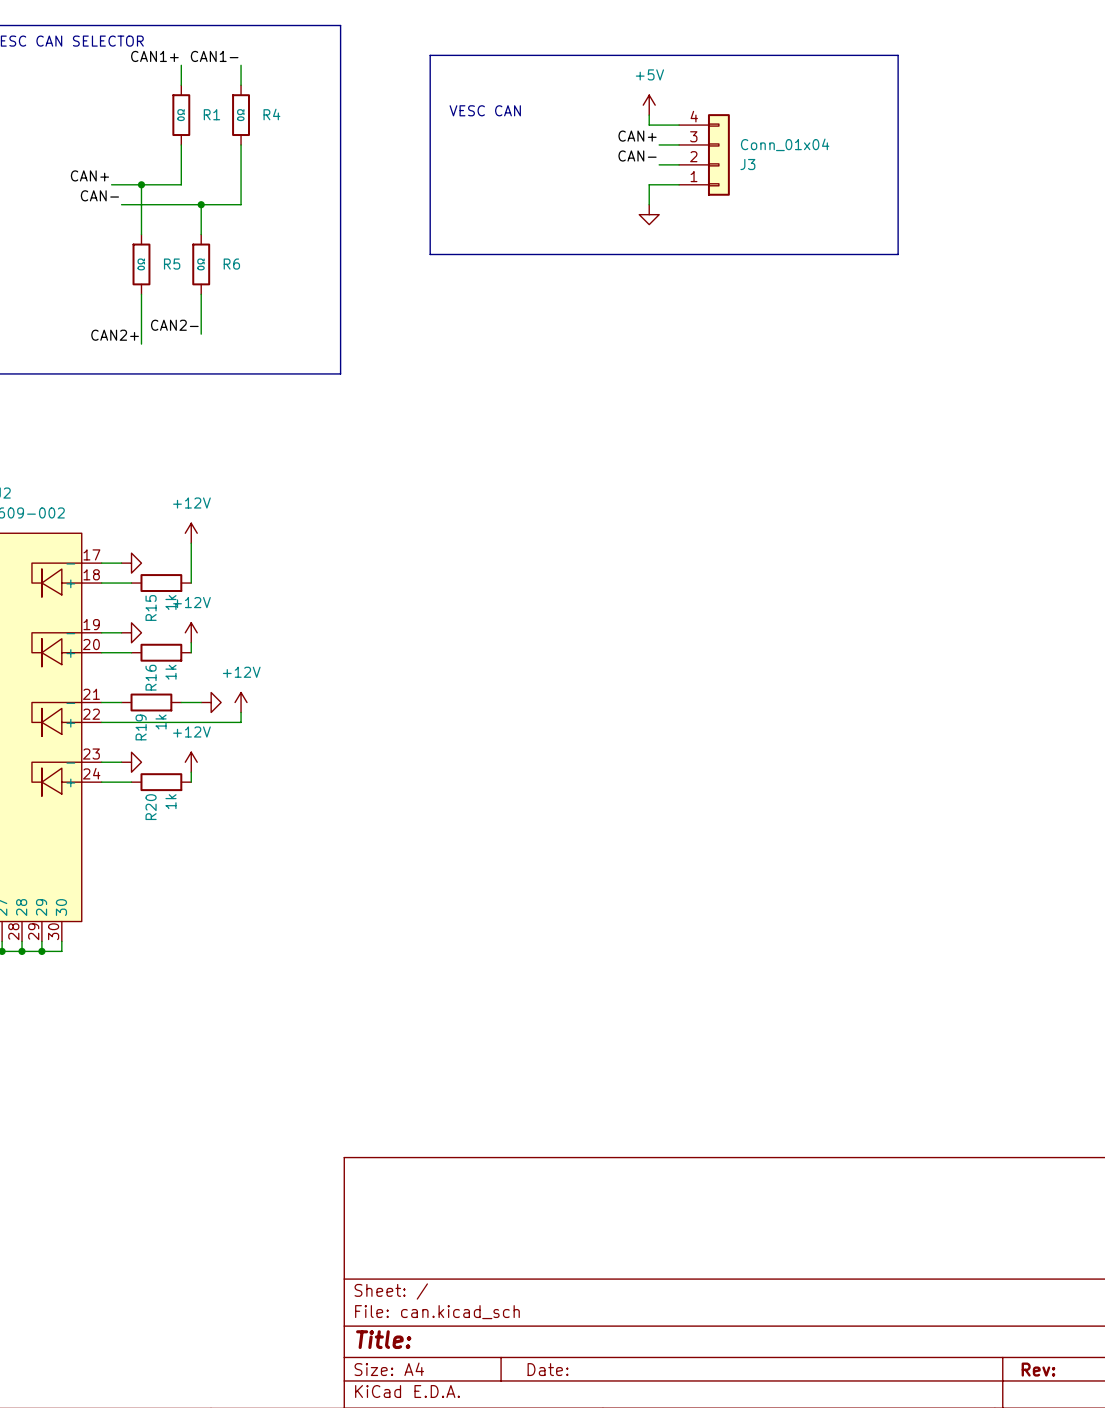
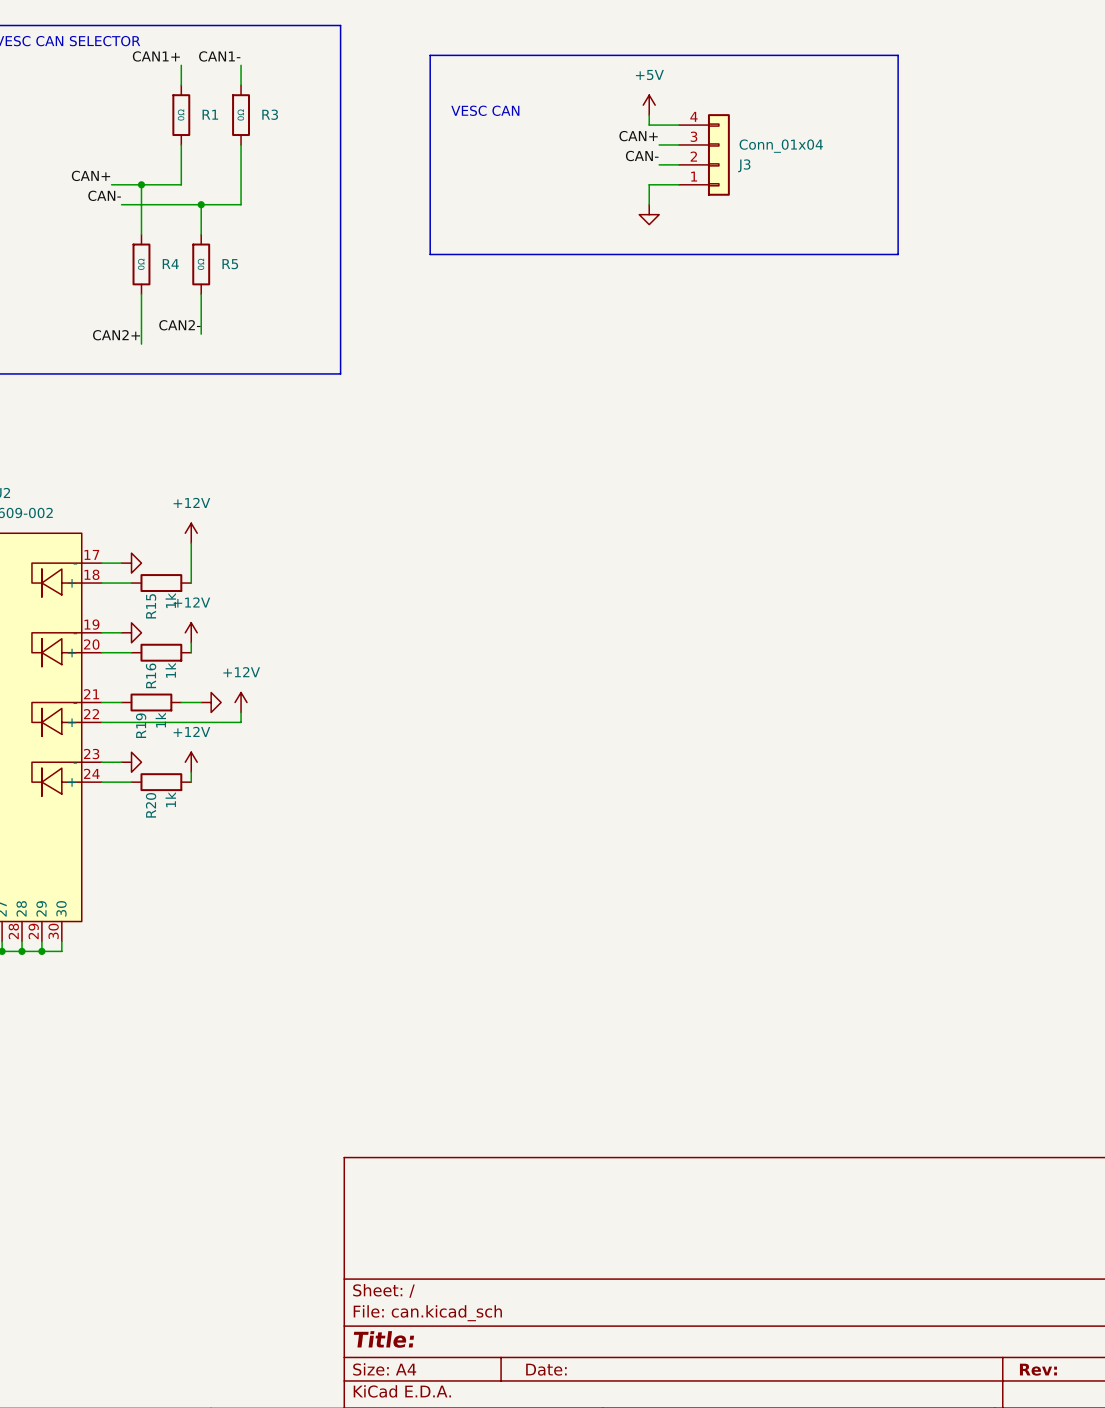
R4 name: R4 (271, 114) -> R3 (270, 114)
R5 name: R5 (172, 264) -> R4 (170, 264)
R6 name: R6 (231, 264) -> R5 (230, 264)

